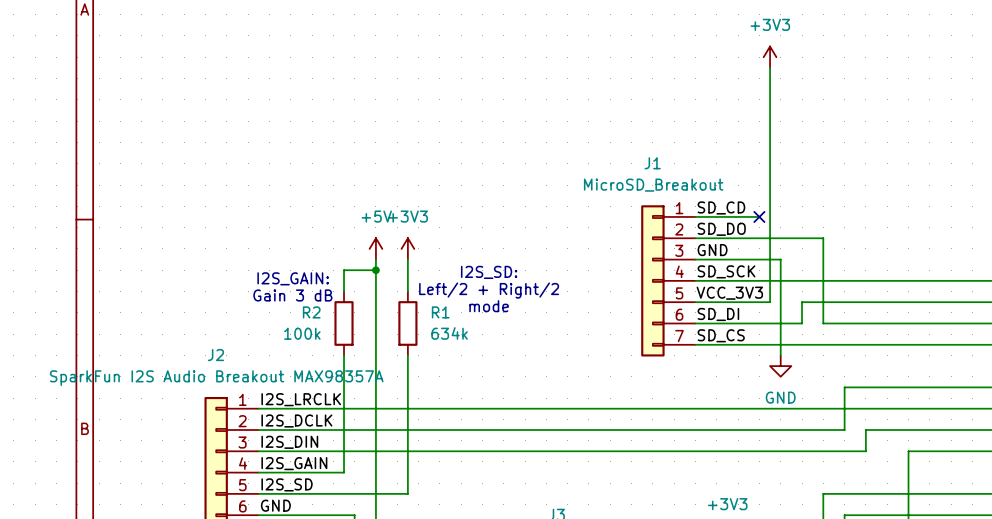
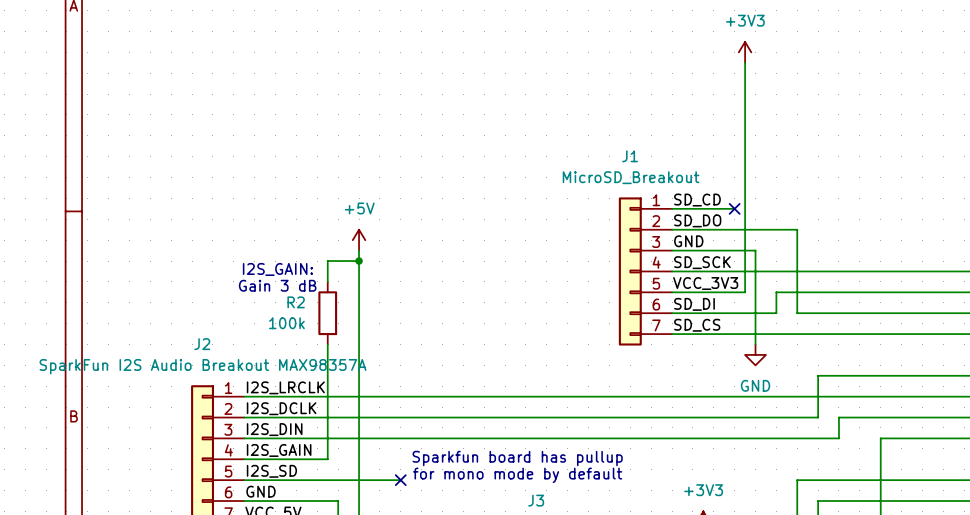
power symbol: +3V3 (407, 248) -> none
wire: (407, 259) (407, 291) -> none
text: I2S_SD: (489, 272) -> none
text: Left/2 + Right/2 (489, 290) -> none
text: mode (489, 306) -> none
R1: 634k (407, 323) -> none
wire: (407, 355) (407, 493) -> (400, 480) (390, 480)
text: none -> Sparkfun board has pullup (517, 458)
text: none -> for mono mode by default (517, 475)
no-connect mark: none -> (400, 480)

